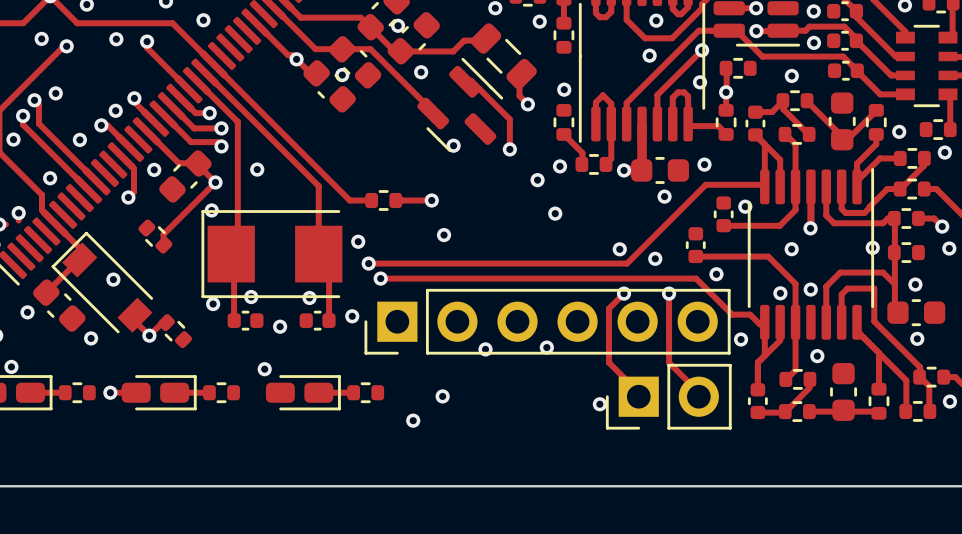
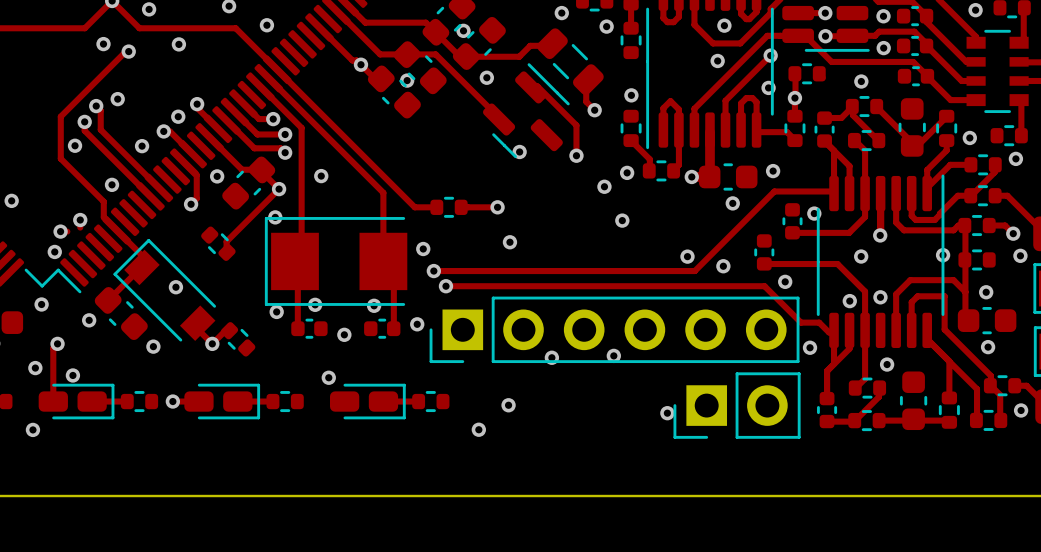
track: (147, 41) (147, 47) (188, 89) -> none
via: (147, 41) -> none
track: (624, 293) (608, 308) (608, 362) (639, 392) -> none
via: (624, 293) -> none
track: (669, 293) (669, 362) (699, 392) -> none
via: (669, 293) -> none

